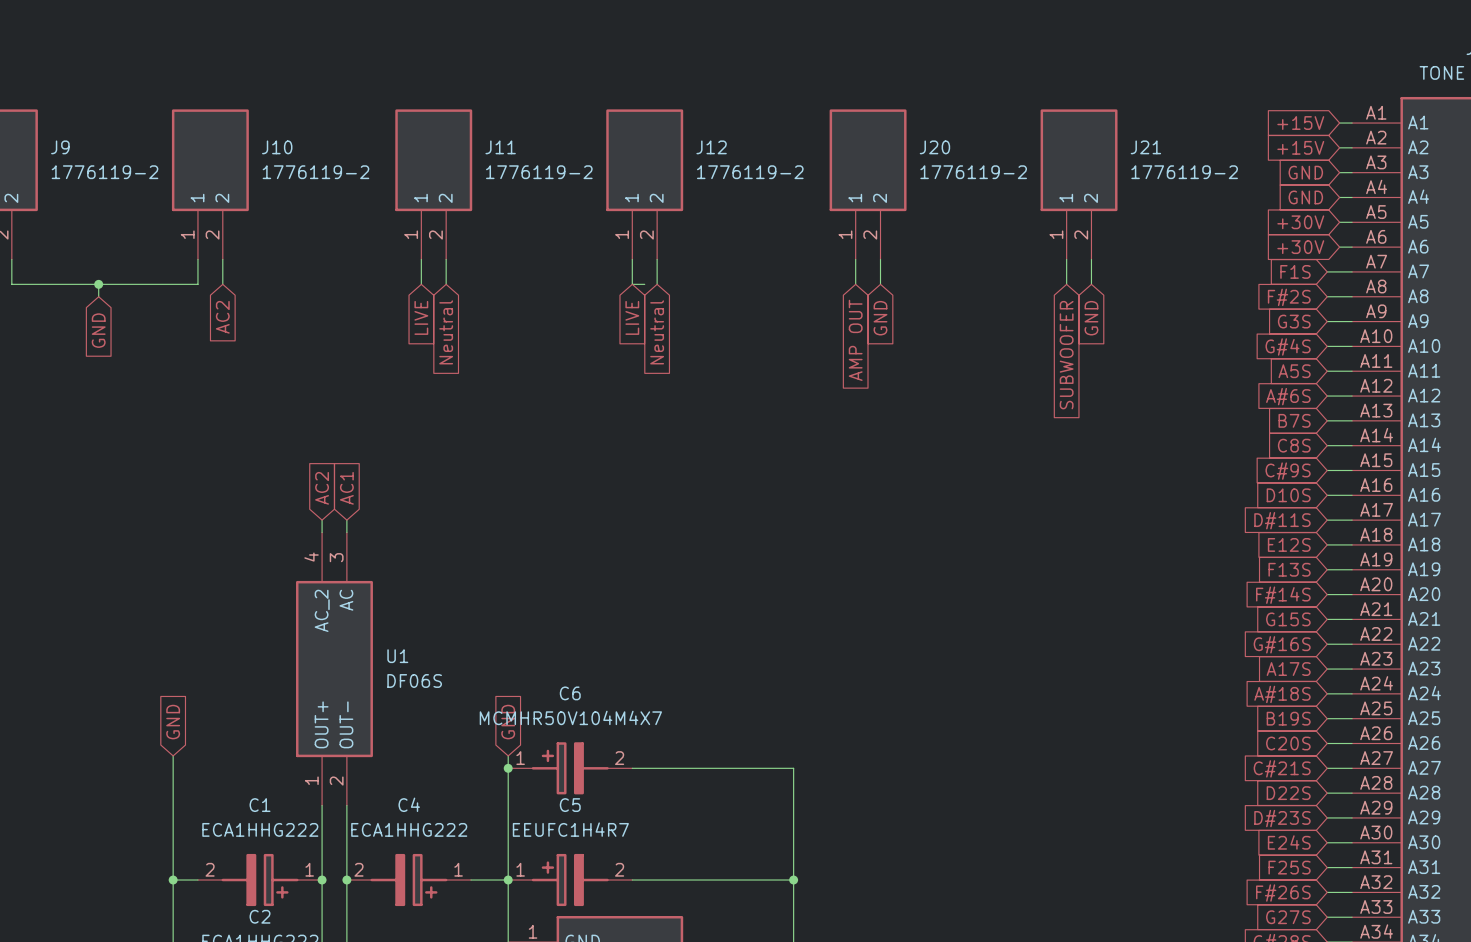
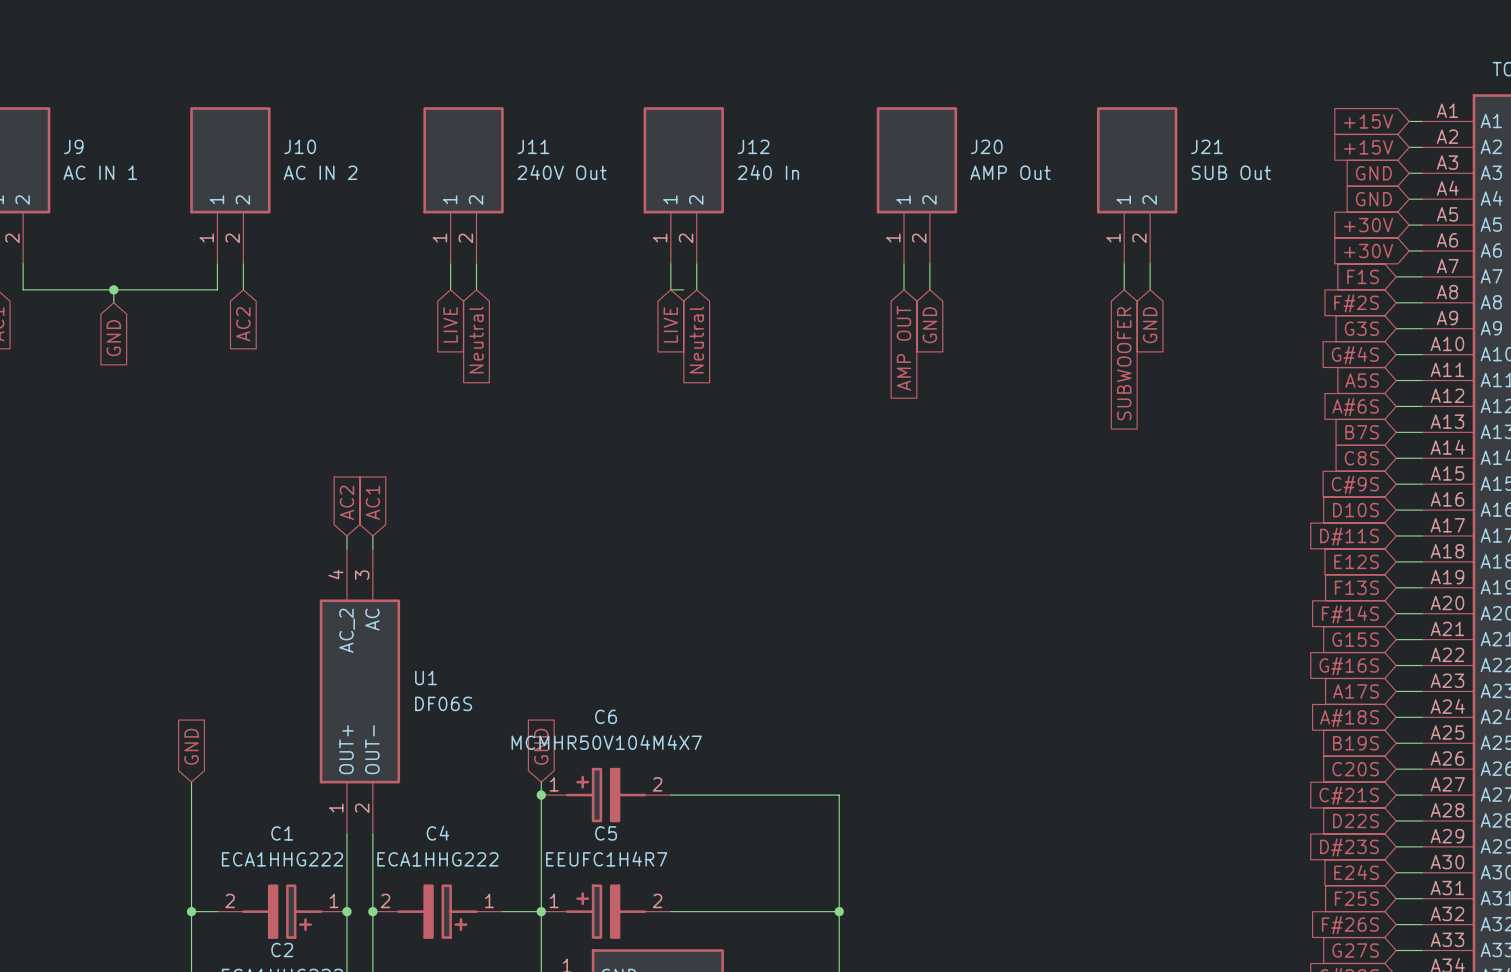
J9 value: 1776119-2 (104, 172) -> AC IN 1 (100, 172)
J10 value: 1776119-2 (315, 172) -> AC IN 2 (320, 172)
J11 value: 1776119-2 (539, 172) -> 240V Out (562, 172)
J12 value: 1776119-2 (750, 172) -> 240 In (768, 172)
J20 value: 1776119-2 (973, 172) -> AMP Out (1010, 172)
J21 value: 1776119-2 (1184, 172) -> SUB Out (1231, 172)

